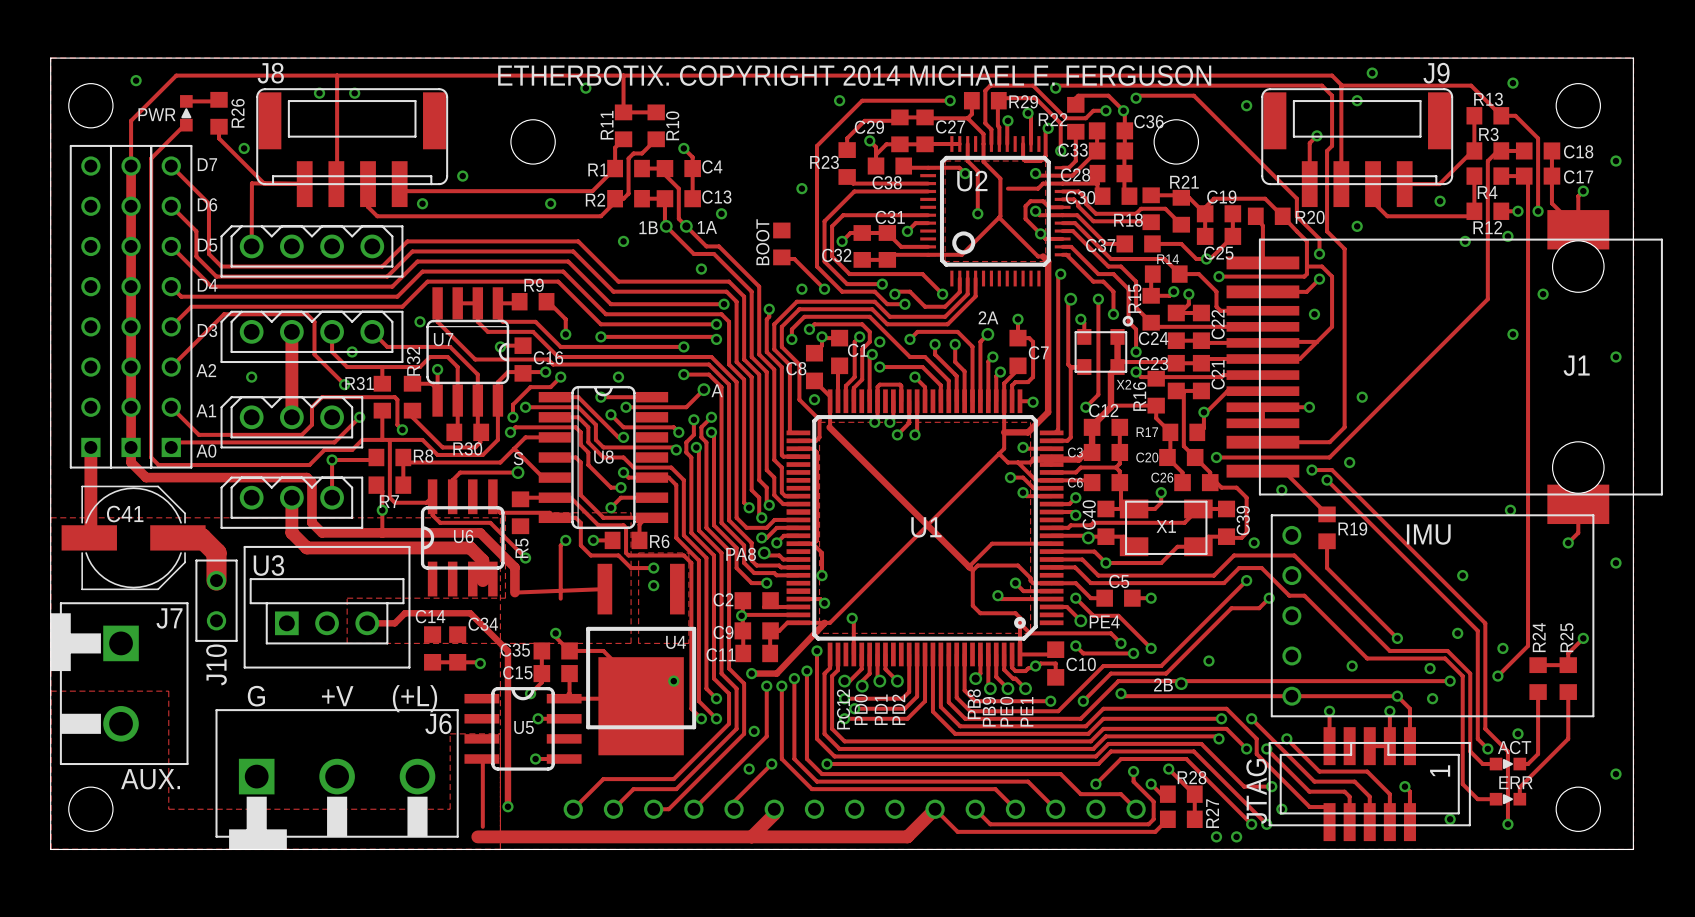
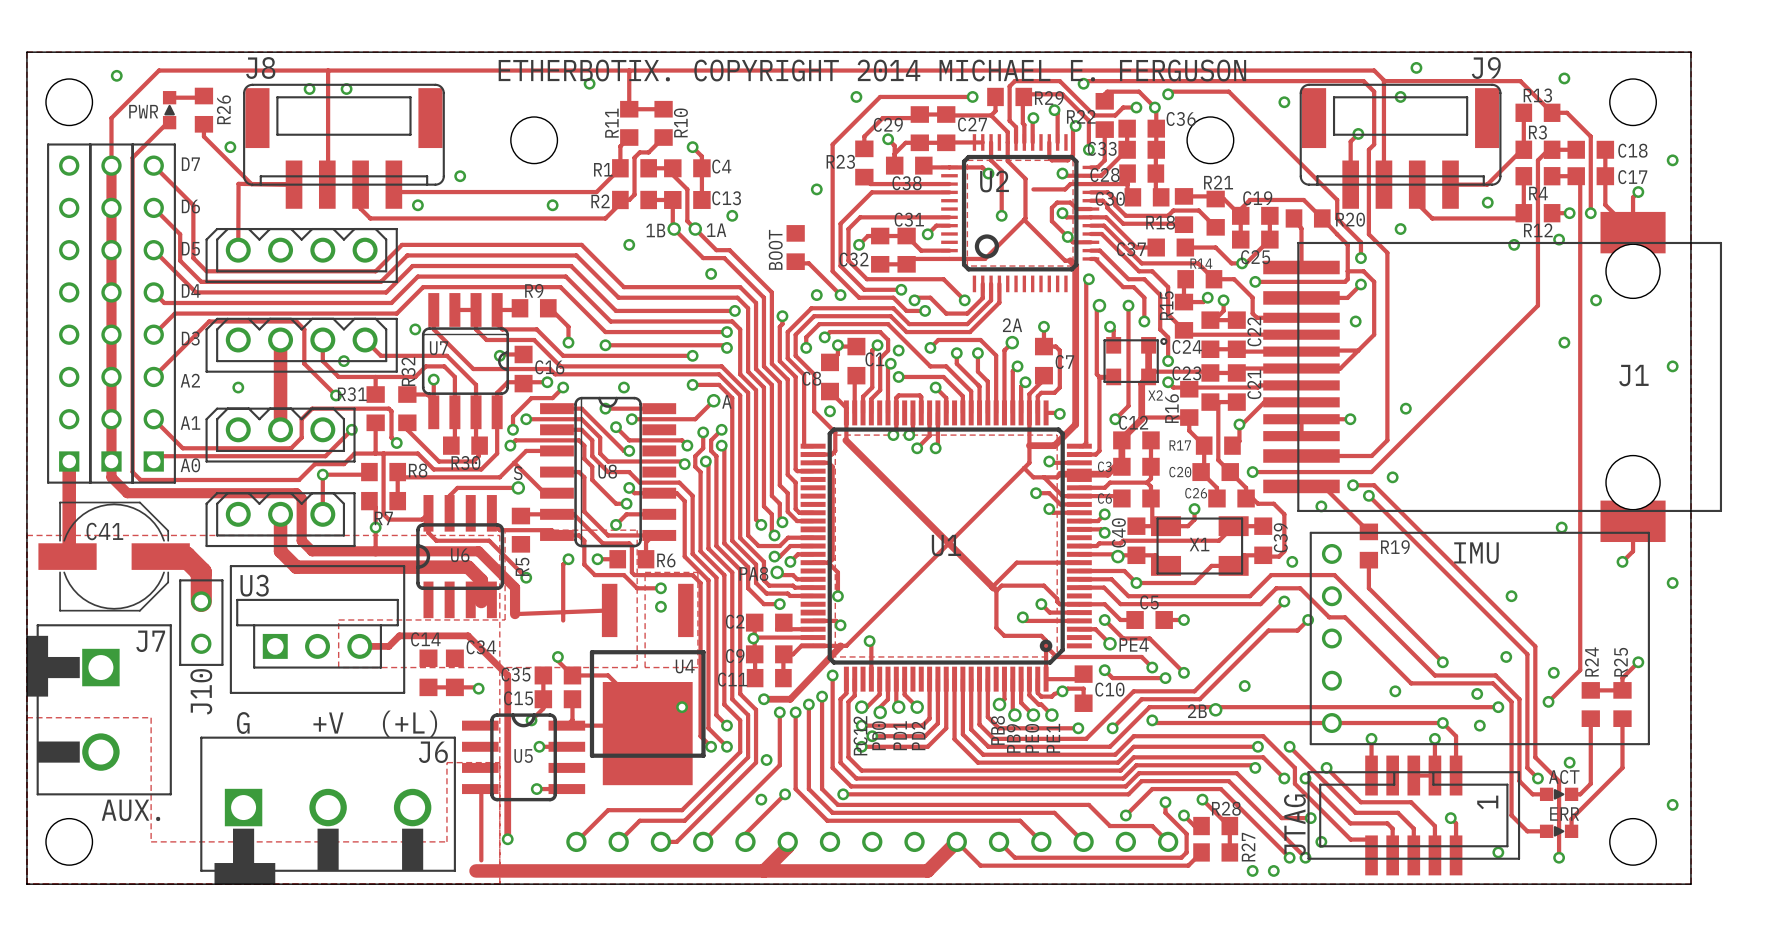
X2 footprint: [1074, 315, 1134, 375] -> [1103, 336, 1168, 386]

